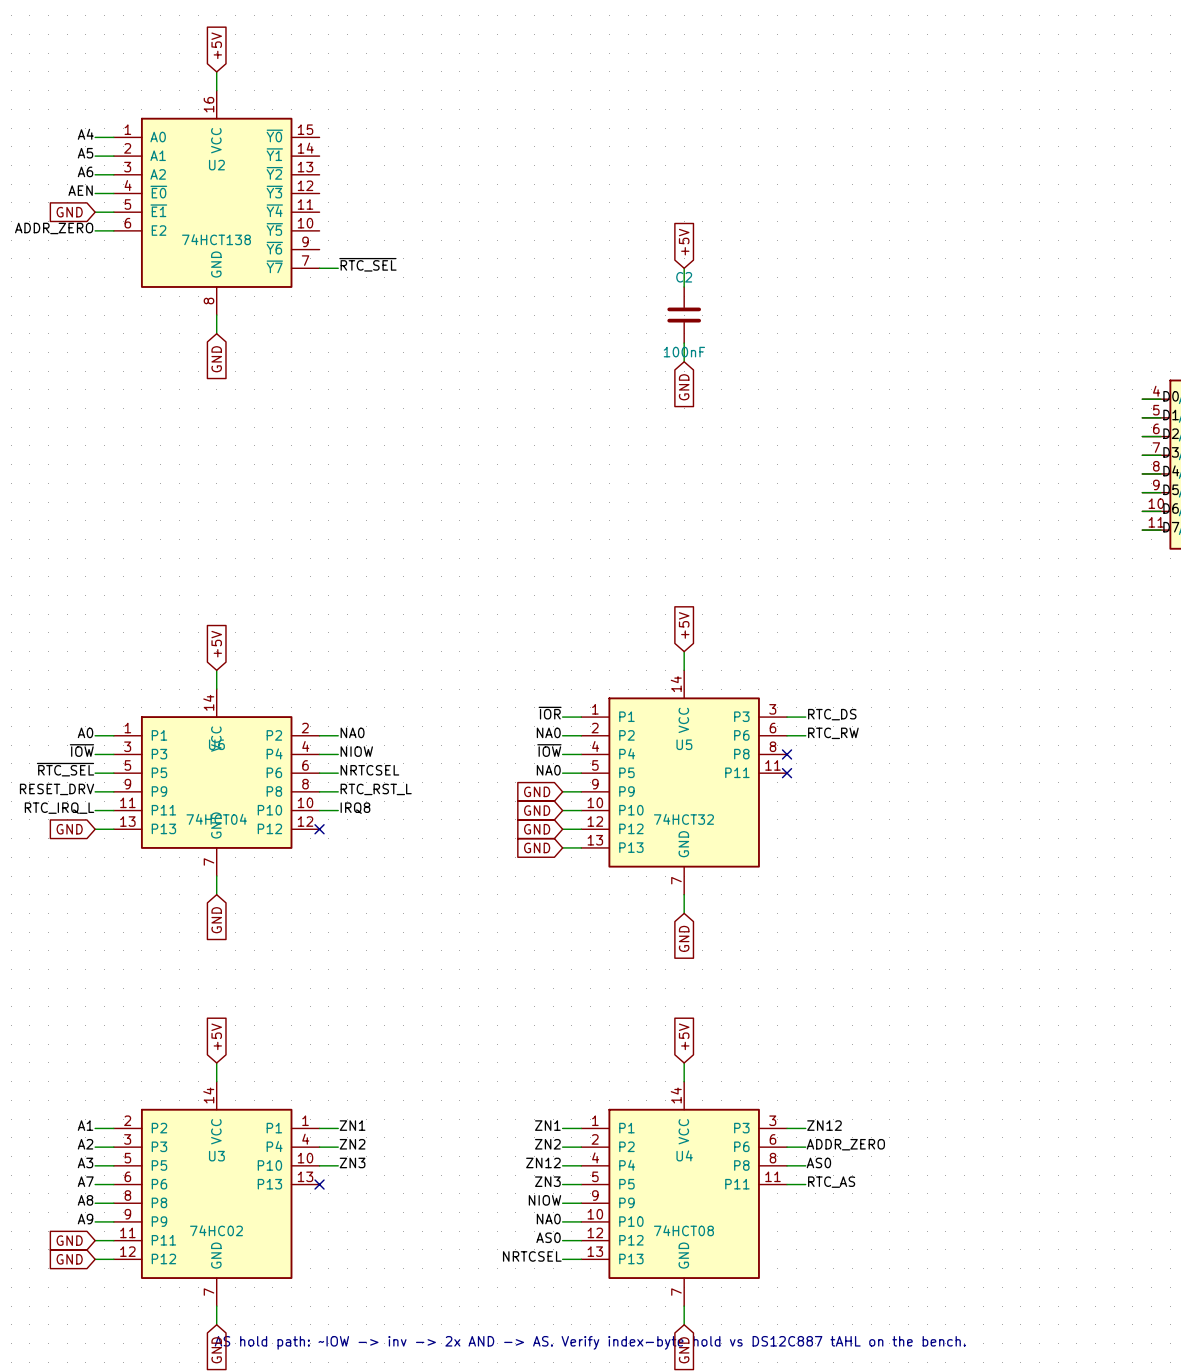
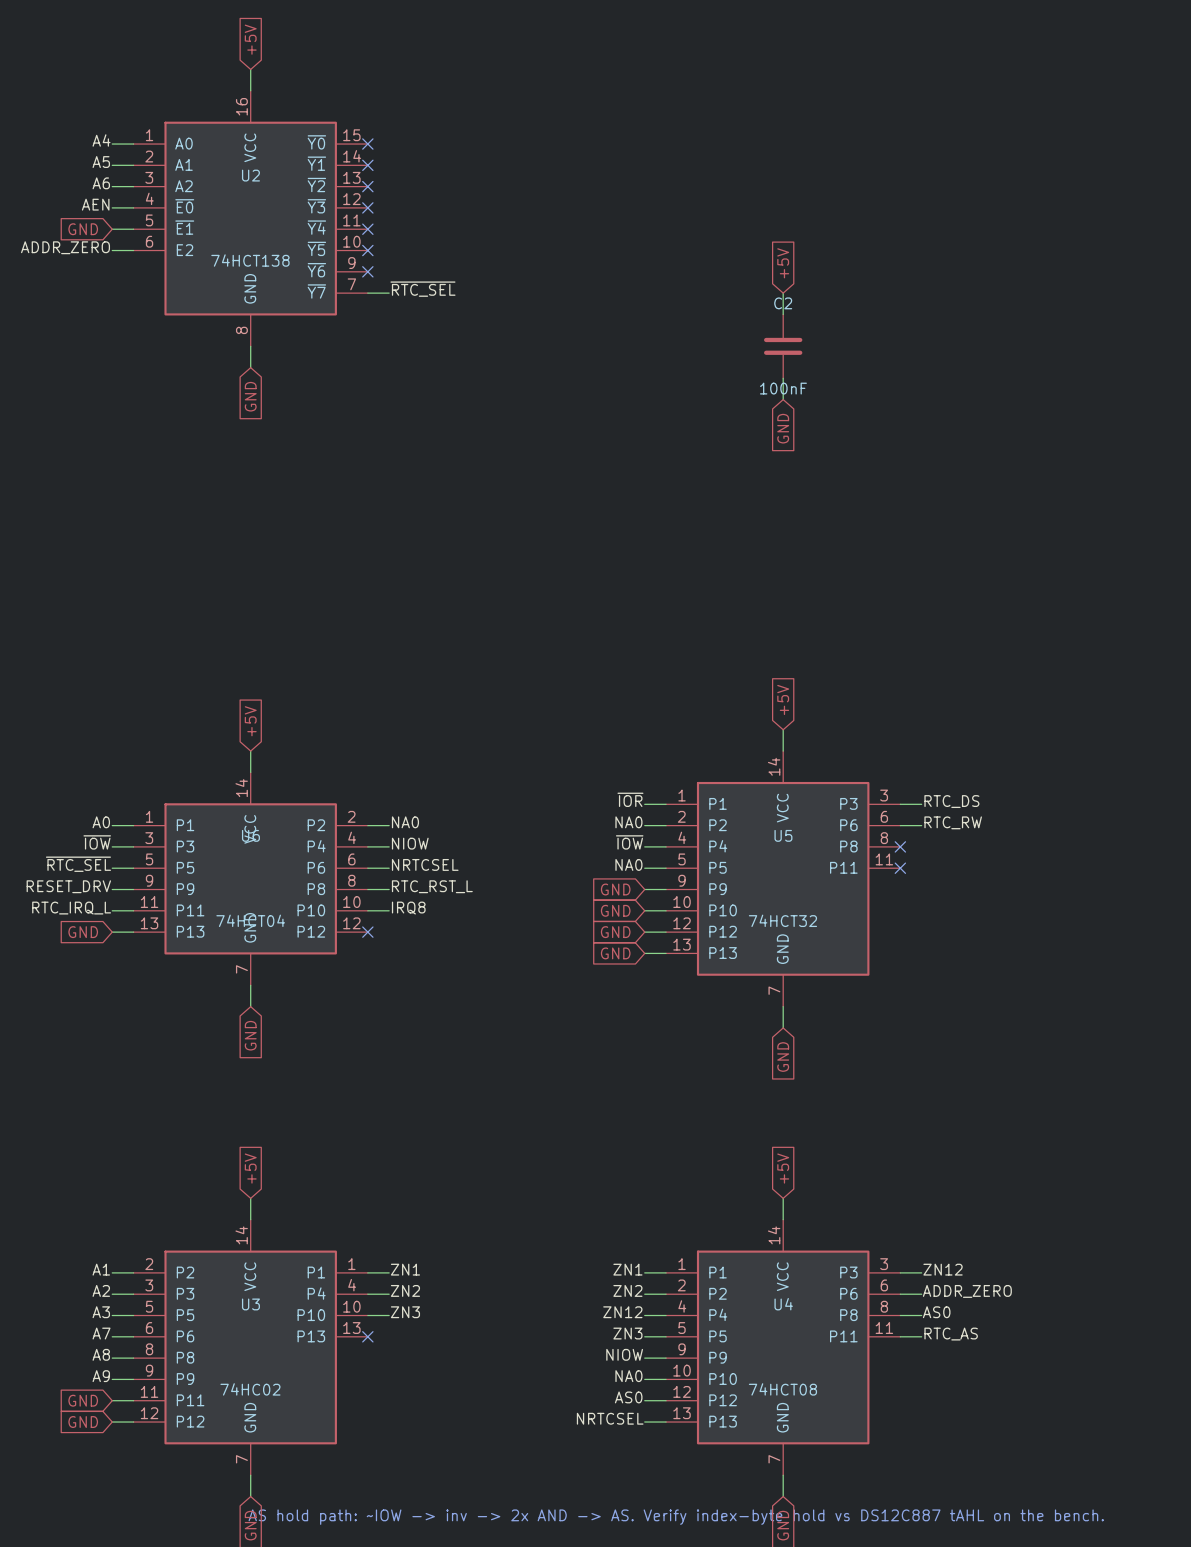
no-connect mark: none -> (367, 144)
no-connect mark: none -> (367, 165)
no-connect mark: none -> (367, 186)
no-connect mark: none -> (367, 207)
no-connect mark: none -> (367, 229)
no-connect mark: none -> (367, 250)
no-connect mark: none -> (367, 271)

